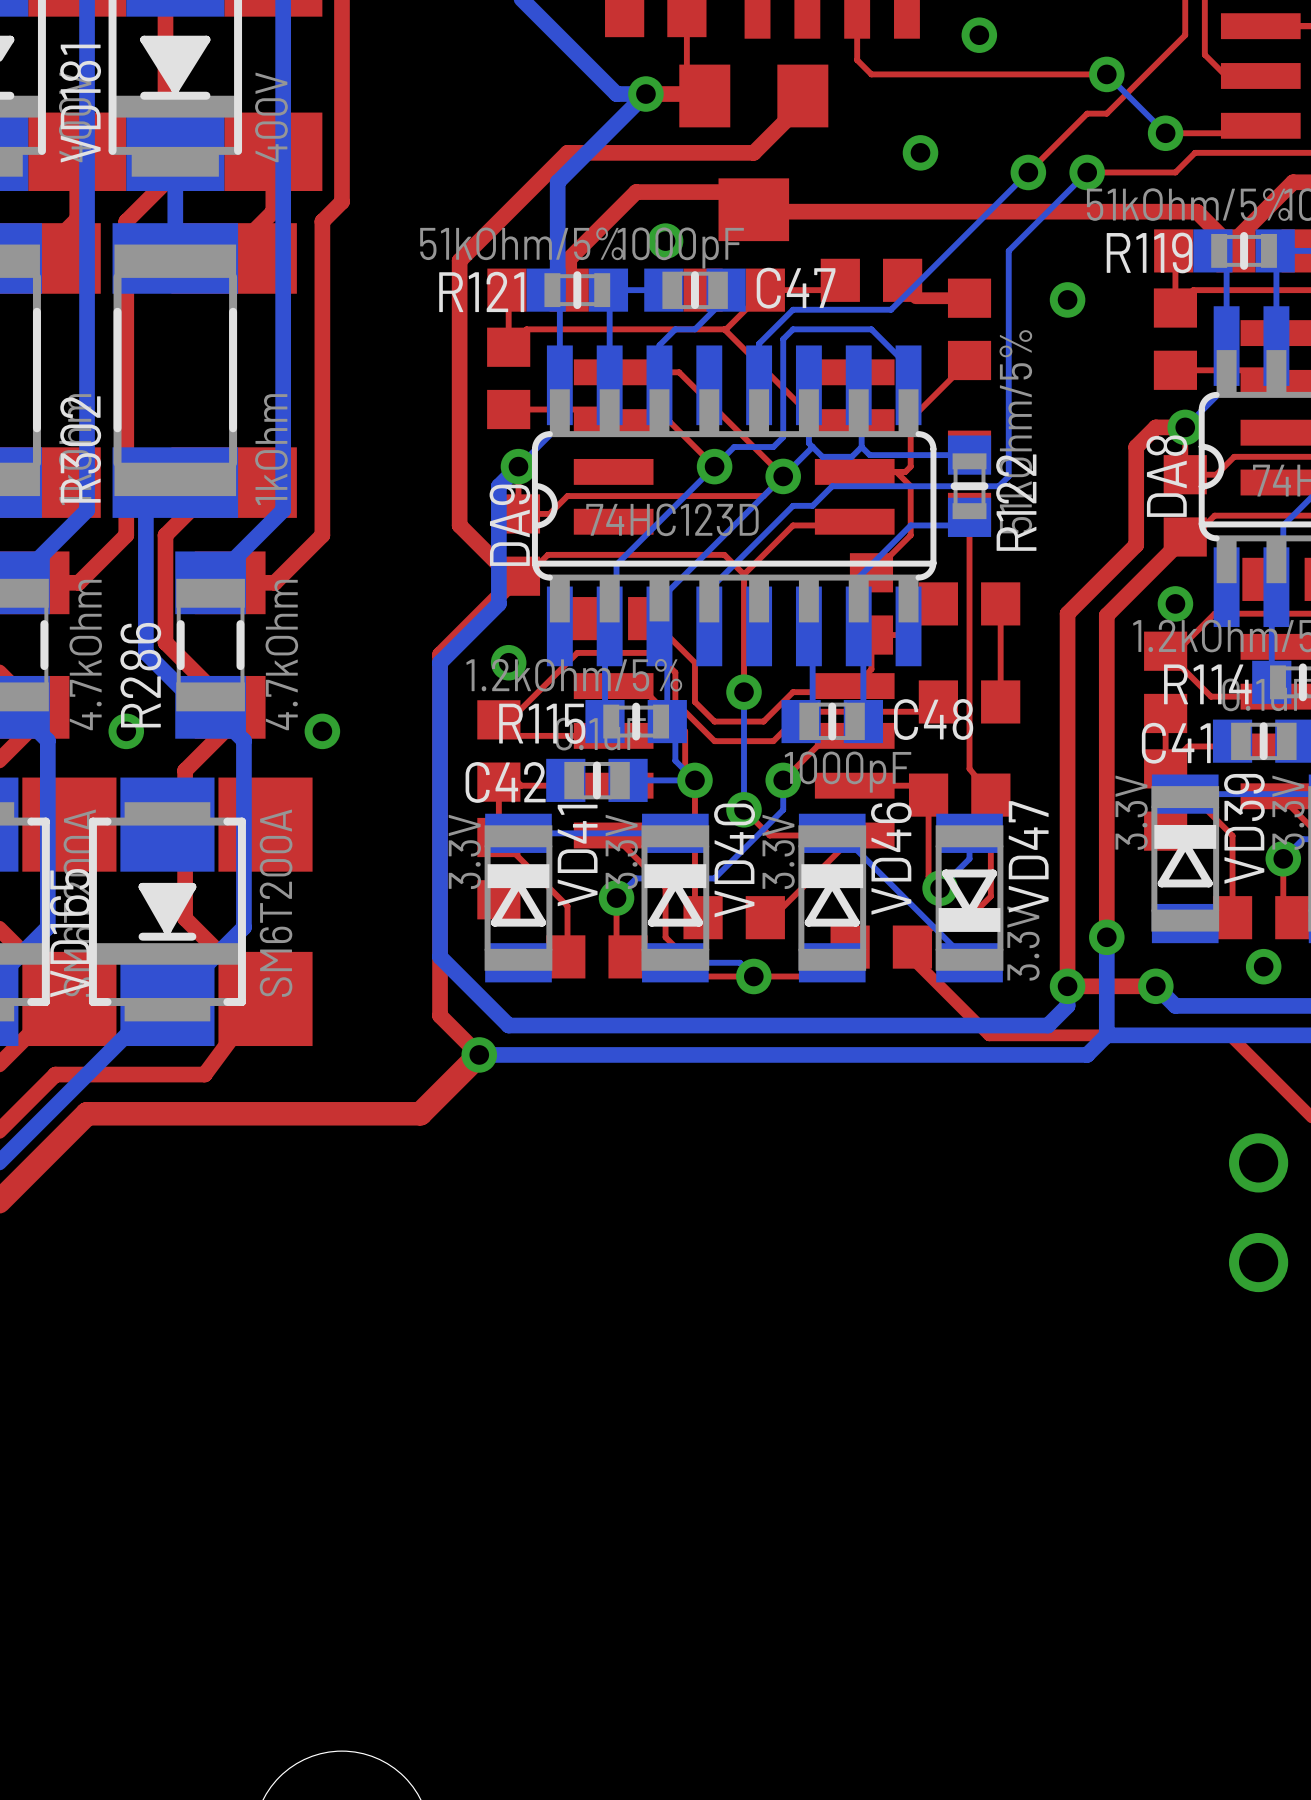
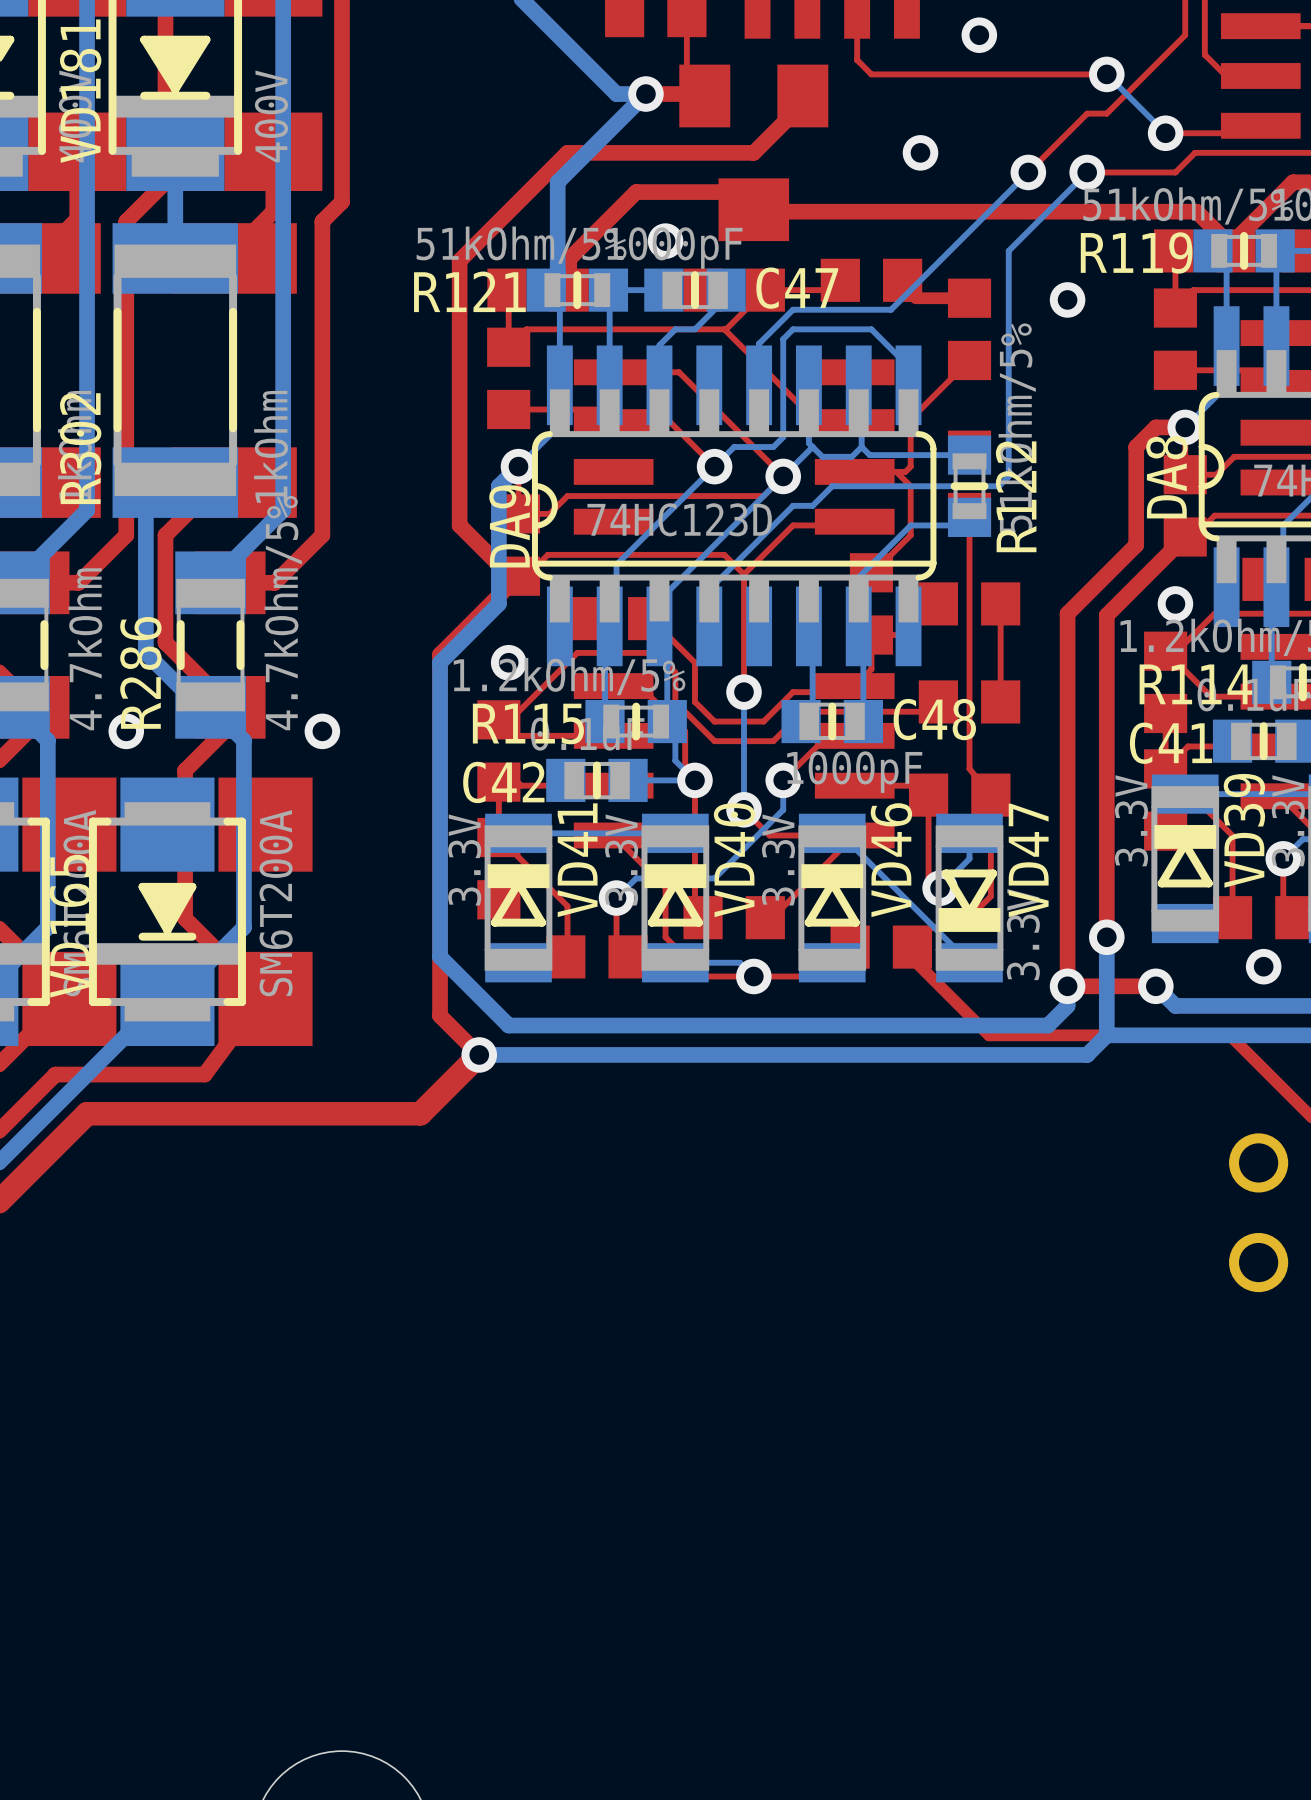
R286 value: 4.7kOhm (281, 655) -> 4.7kOhm/5% (283, 613)

